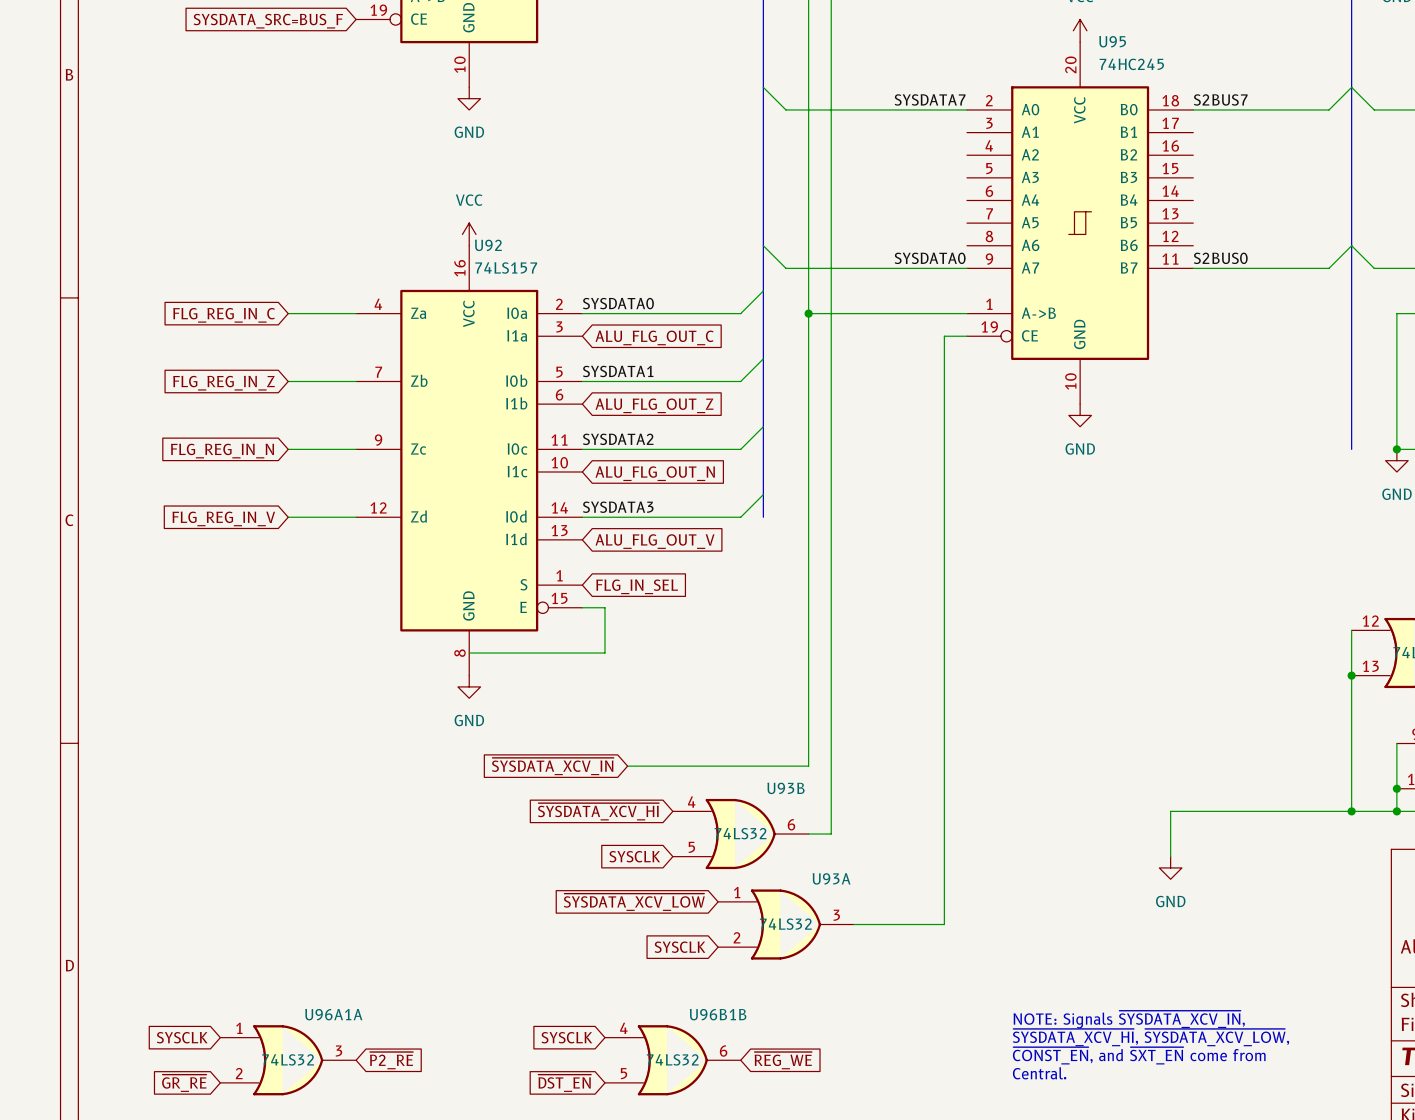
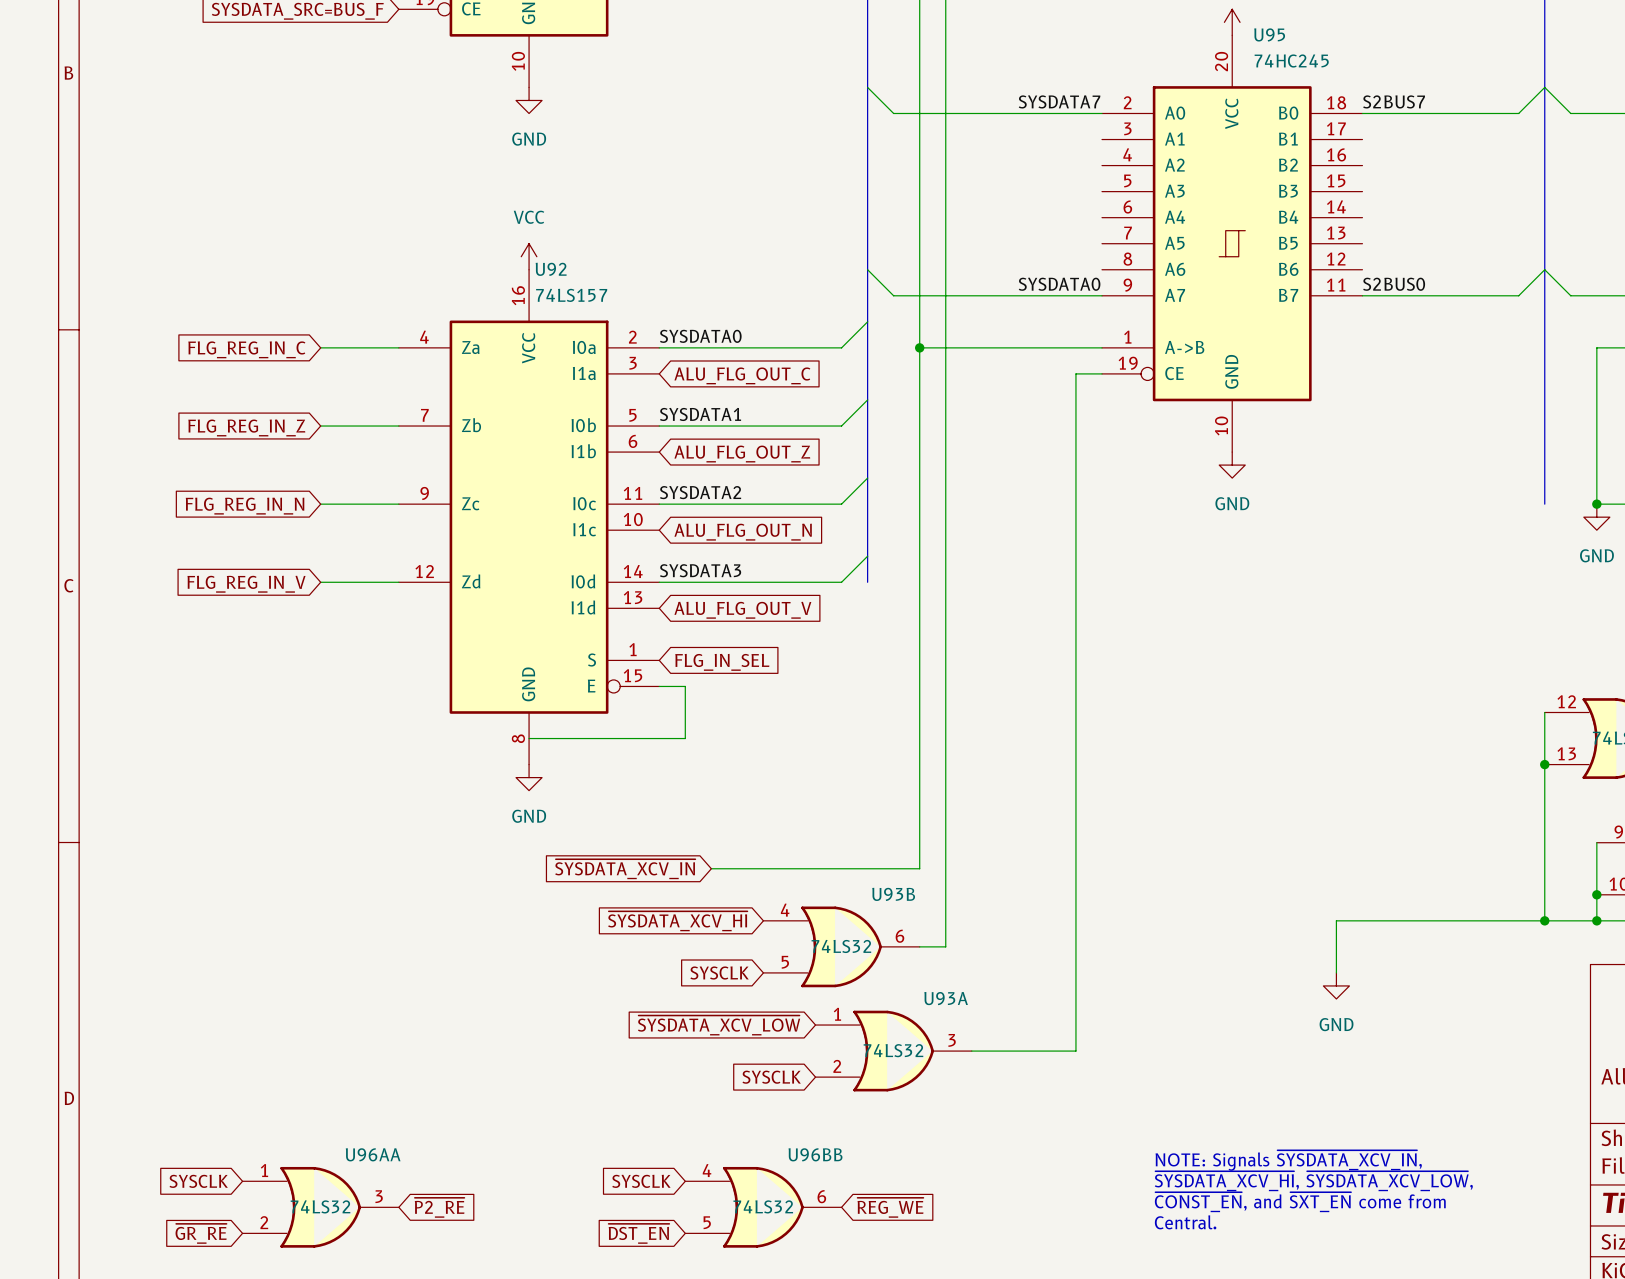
U96A1A name: U96A1A (333, 1014) -> U96AA (373, 1154)
U96B1B name: U96B1B (718, 1014) -> U96BB (815, 1154)

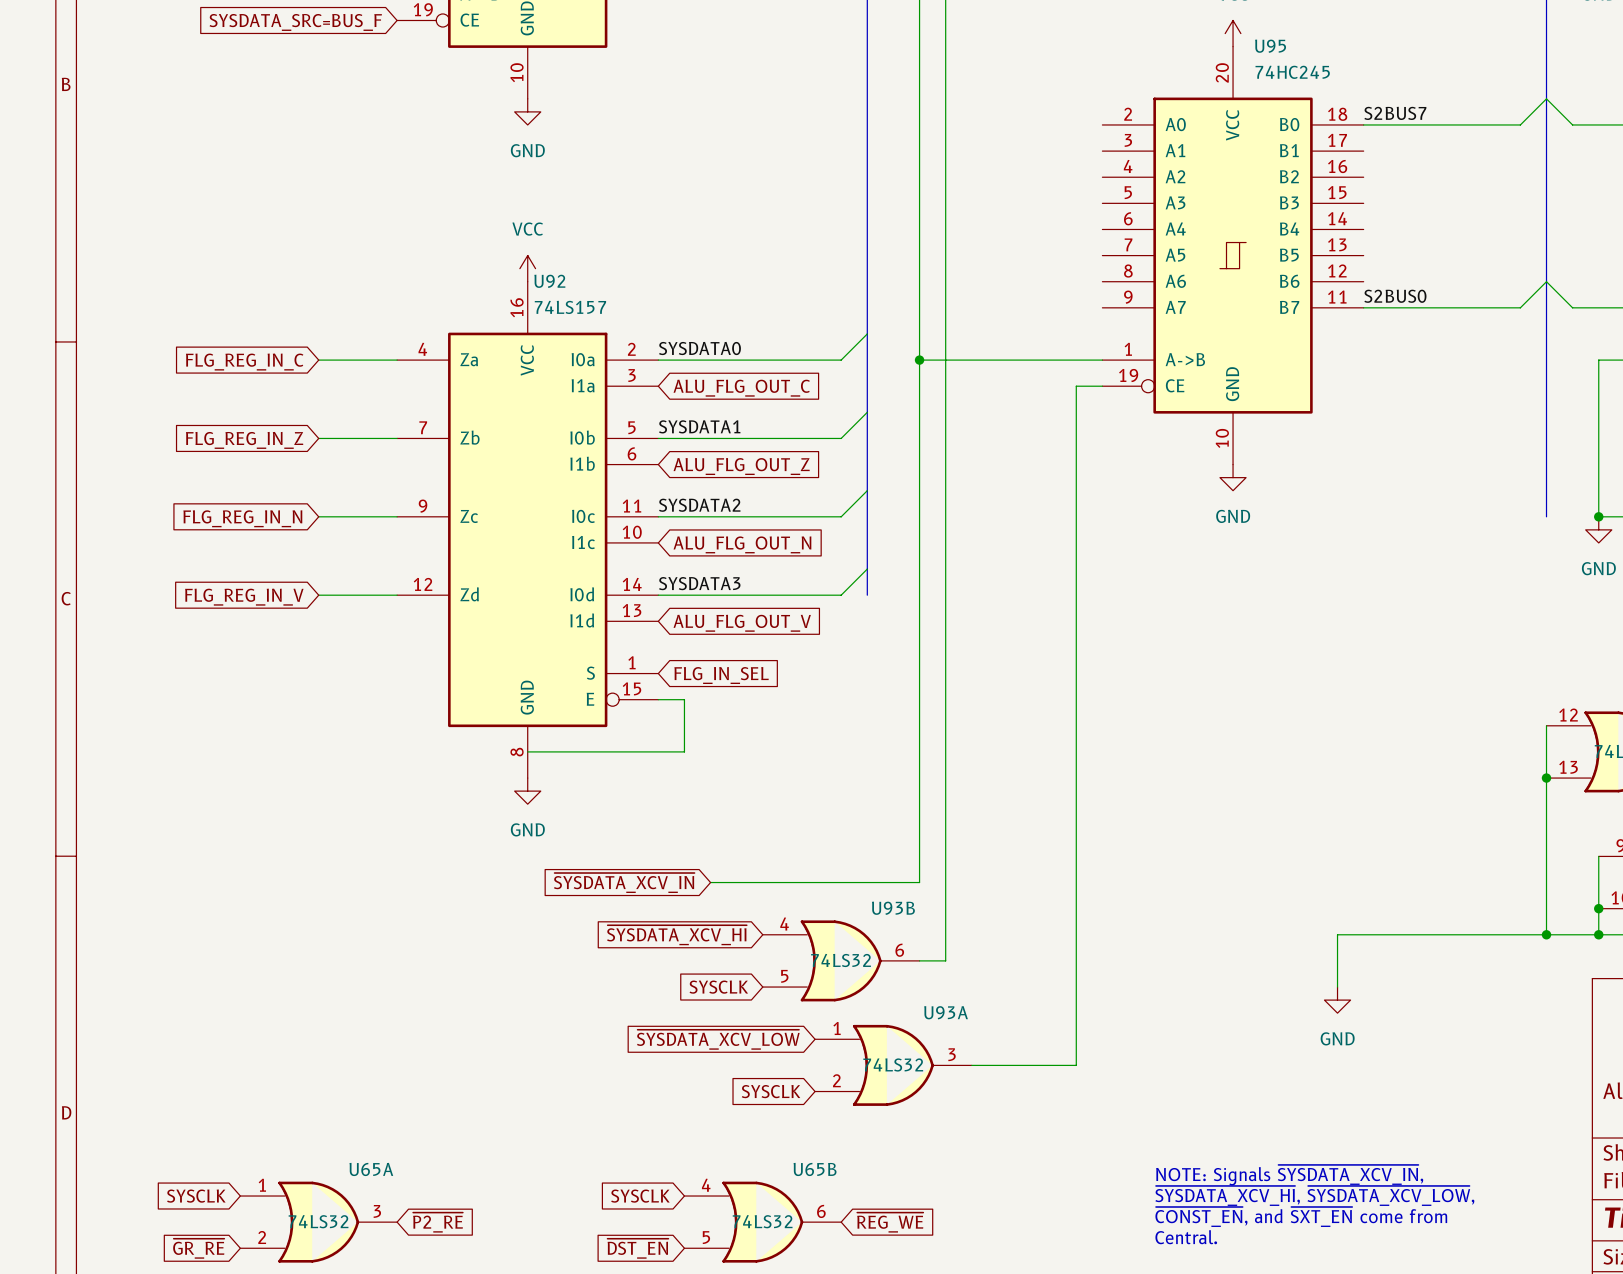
wire: (867, 87) (893, 113) (1102, 113) -> none
label: SYSDATA7 (1059, 101) -> none
wire: (867, 269) (893, 295) (1102, 295) -> none
label: SYSDATA0 (1059, 284) -> none
U96AA name: U96AA (373, 1154) -> U65A (371, 1169)
U96BB name: U96BB (815, 1154) -> U65B (815, 1169)

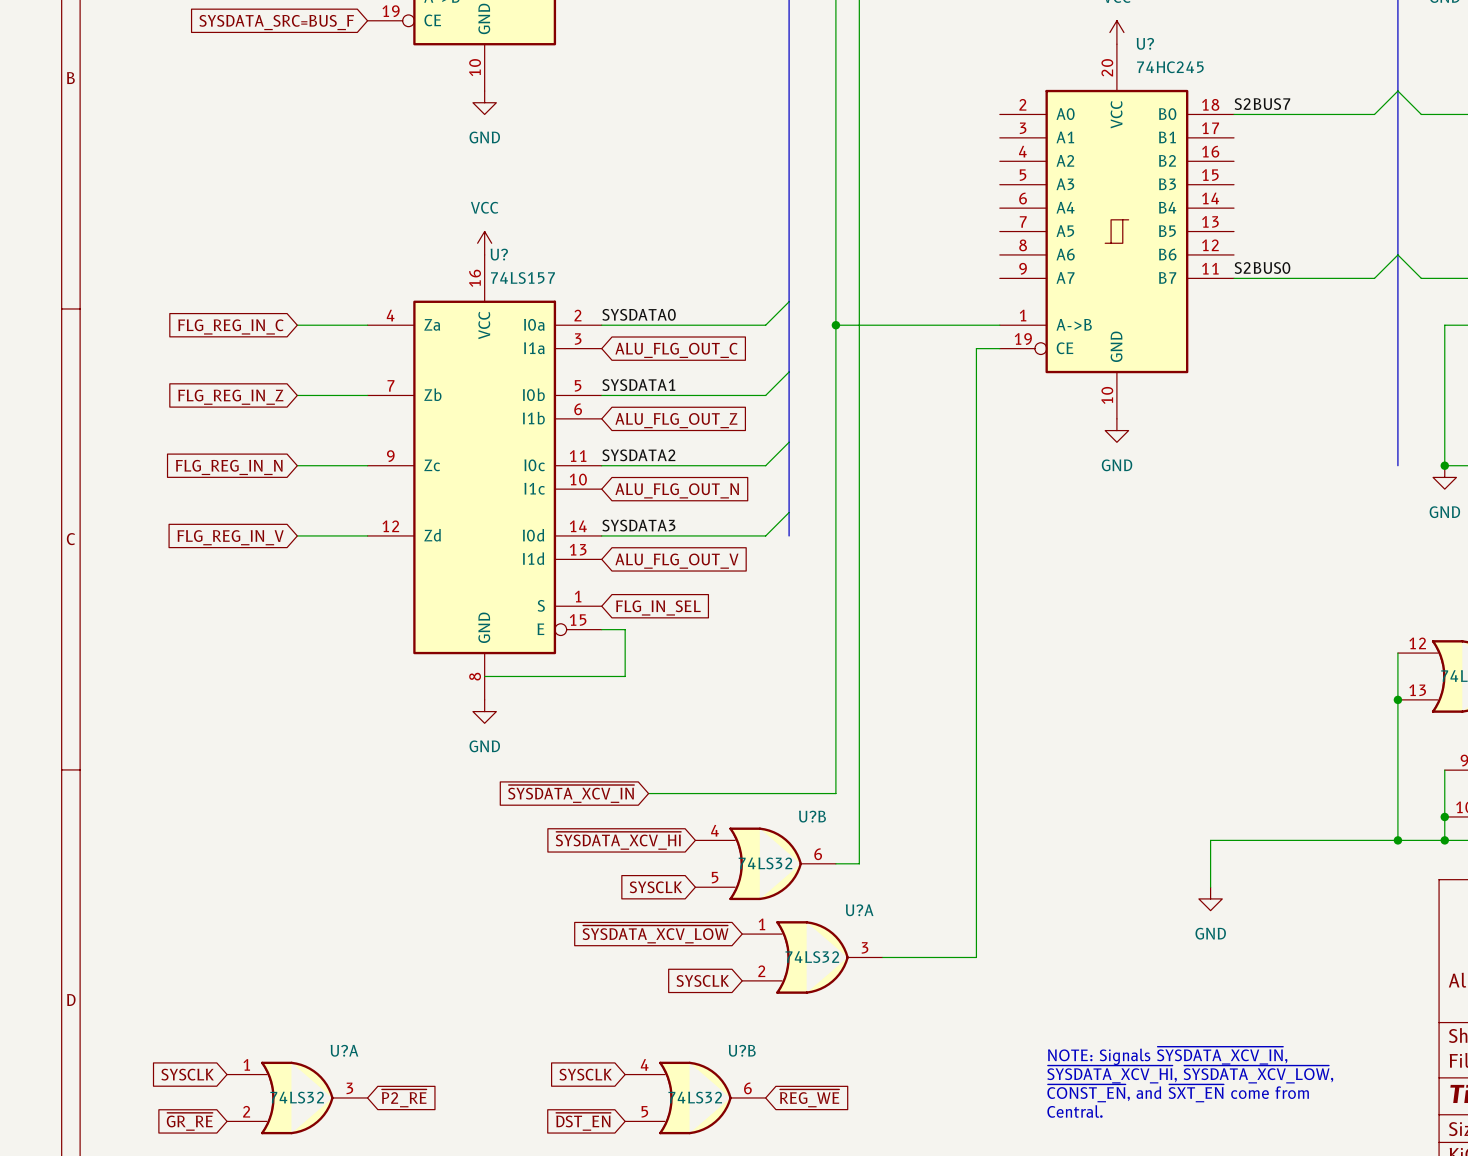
U95 name: U95 (1270, 46) -> U? (1145, 43)
U92 name: U92 (549, 281) -> U? (499, 254)
U93B name: U93B (893, 908) -> U?B (812, 816)
U93A name: U93A (946, 1012) -> U?A (859, 910)
U65A name: U65A (371, 1169) -> U?A (344, 1050)
U65B name: U65B (815, 1169) -> U?B (742, 1050)

